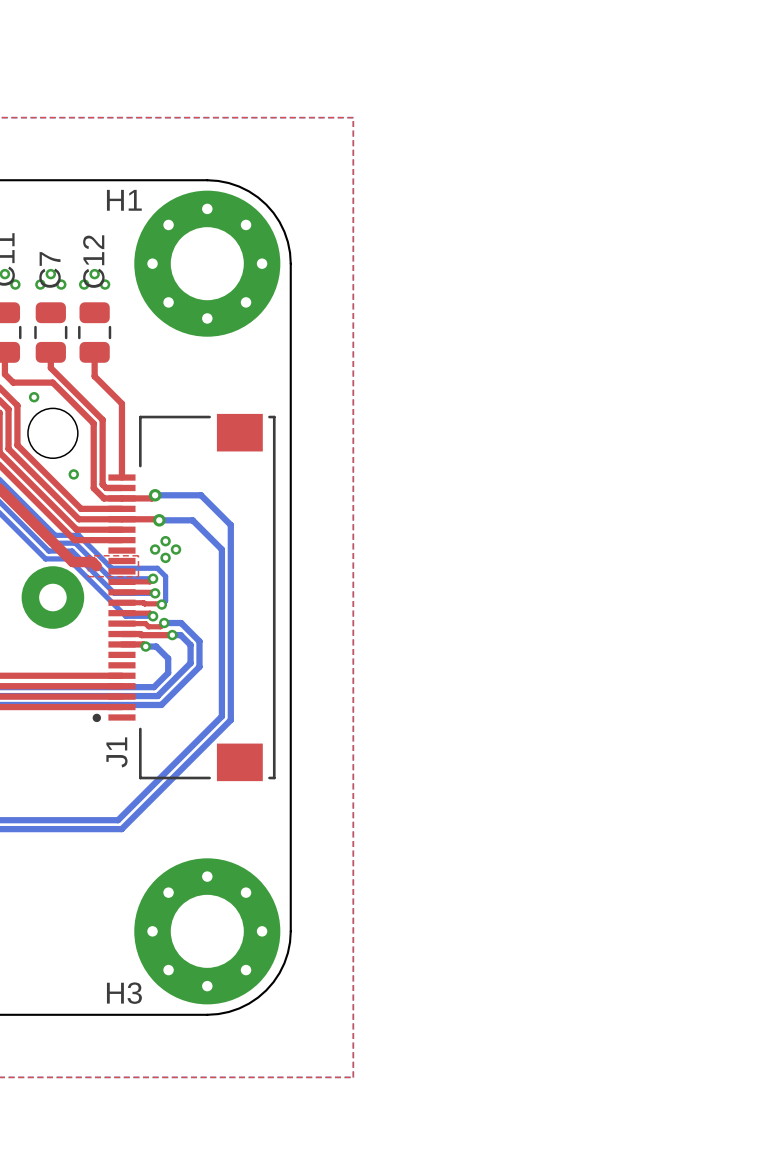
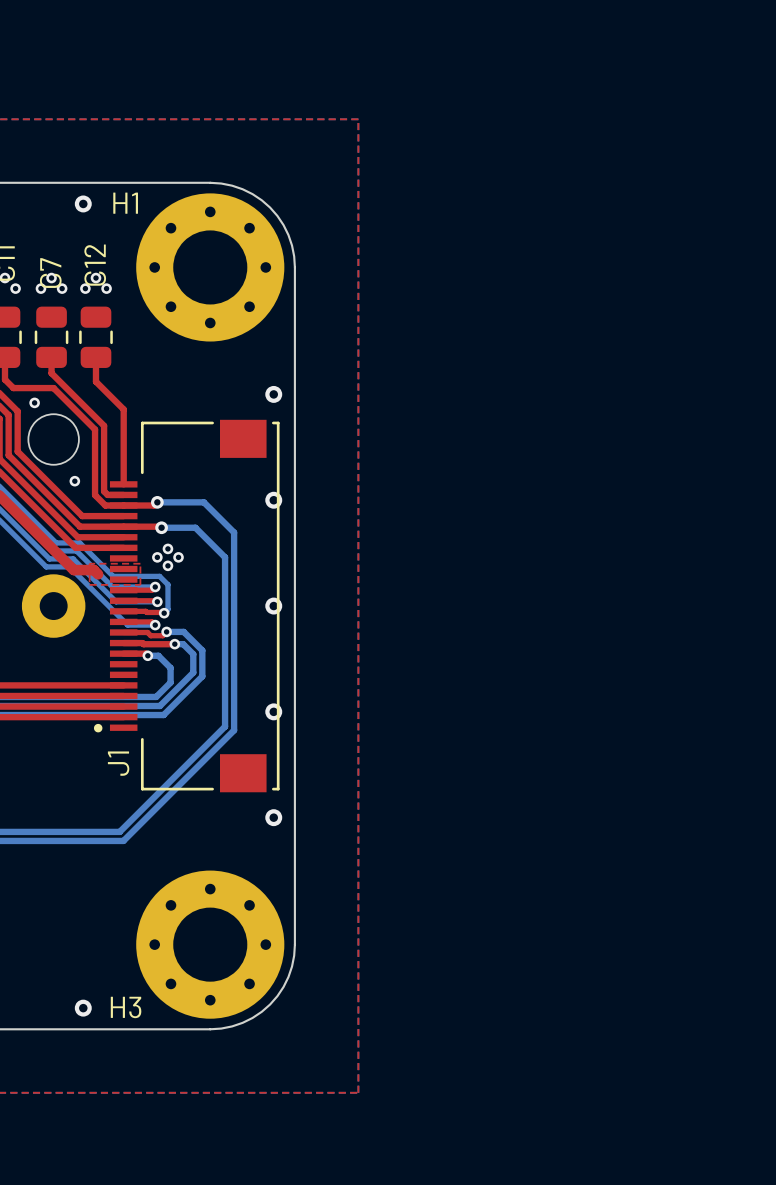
via: none -> (83, 203)
via: none -> (273, 394)
via: none -> (273, 500)
via: none -> (273, 606)
via: none -> (273, 711)
via: none -> (273, 817)
via: none -> (83, 1008)

